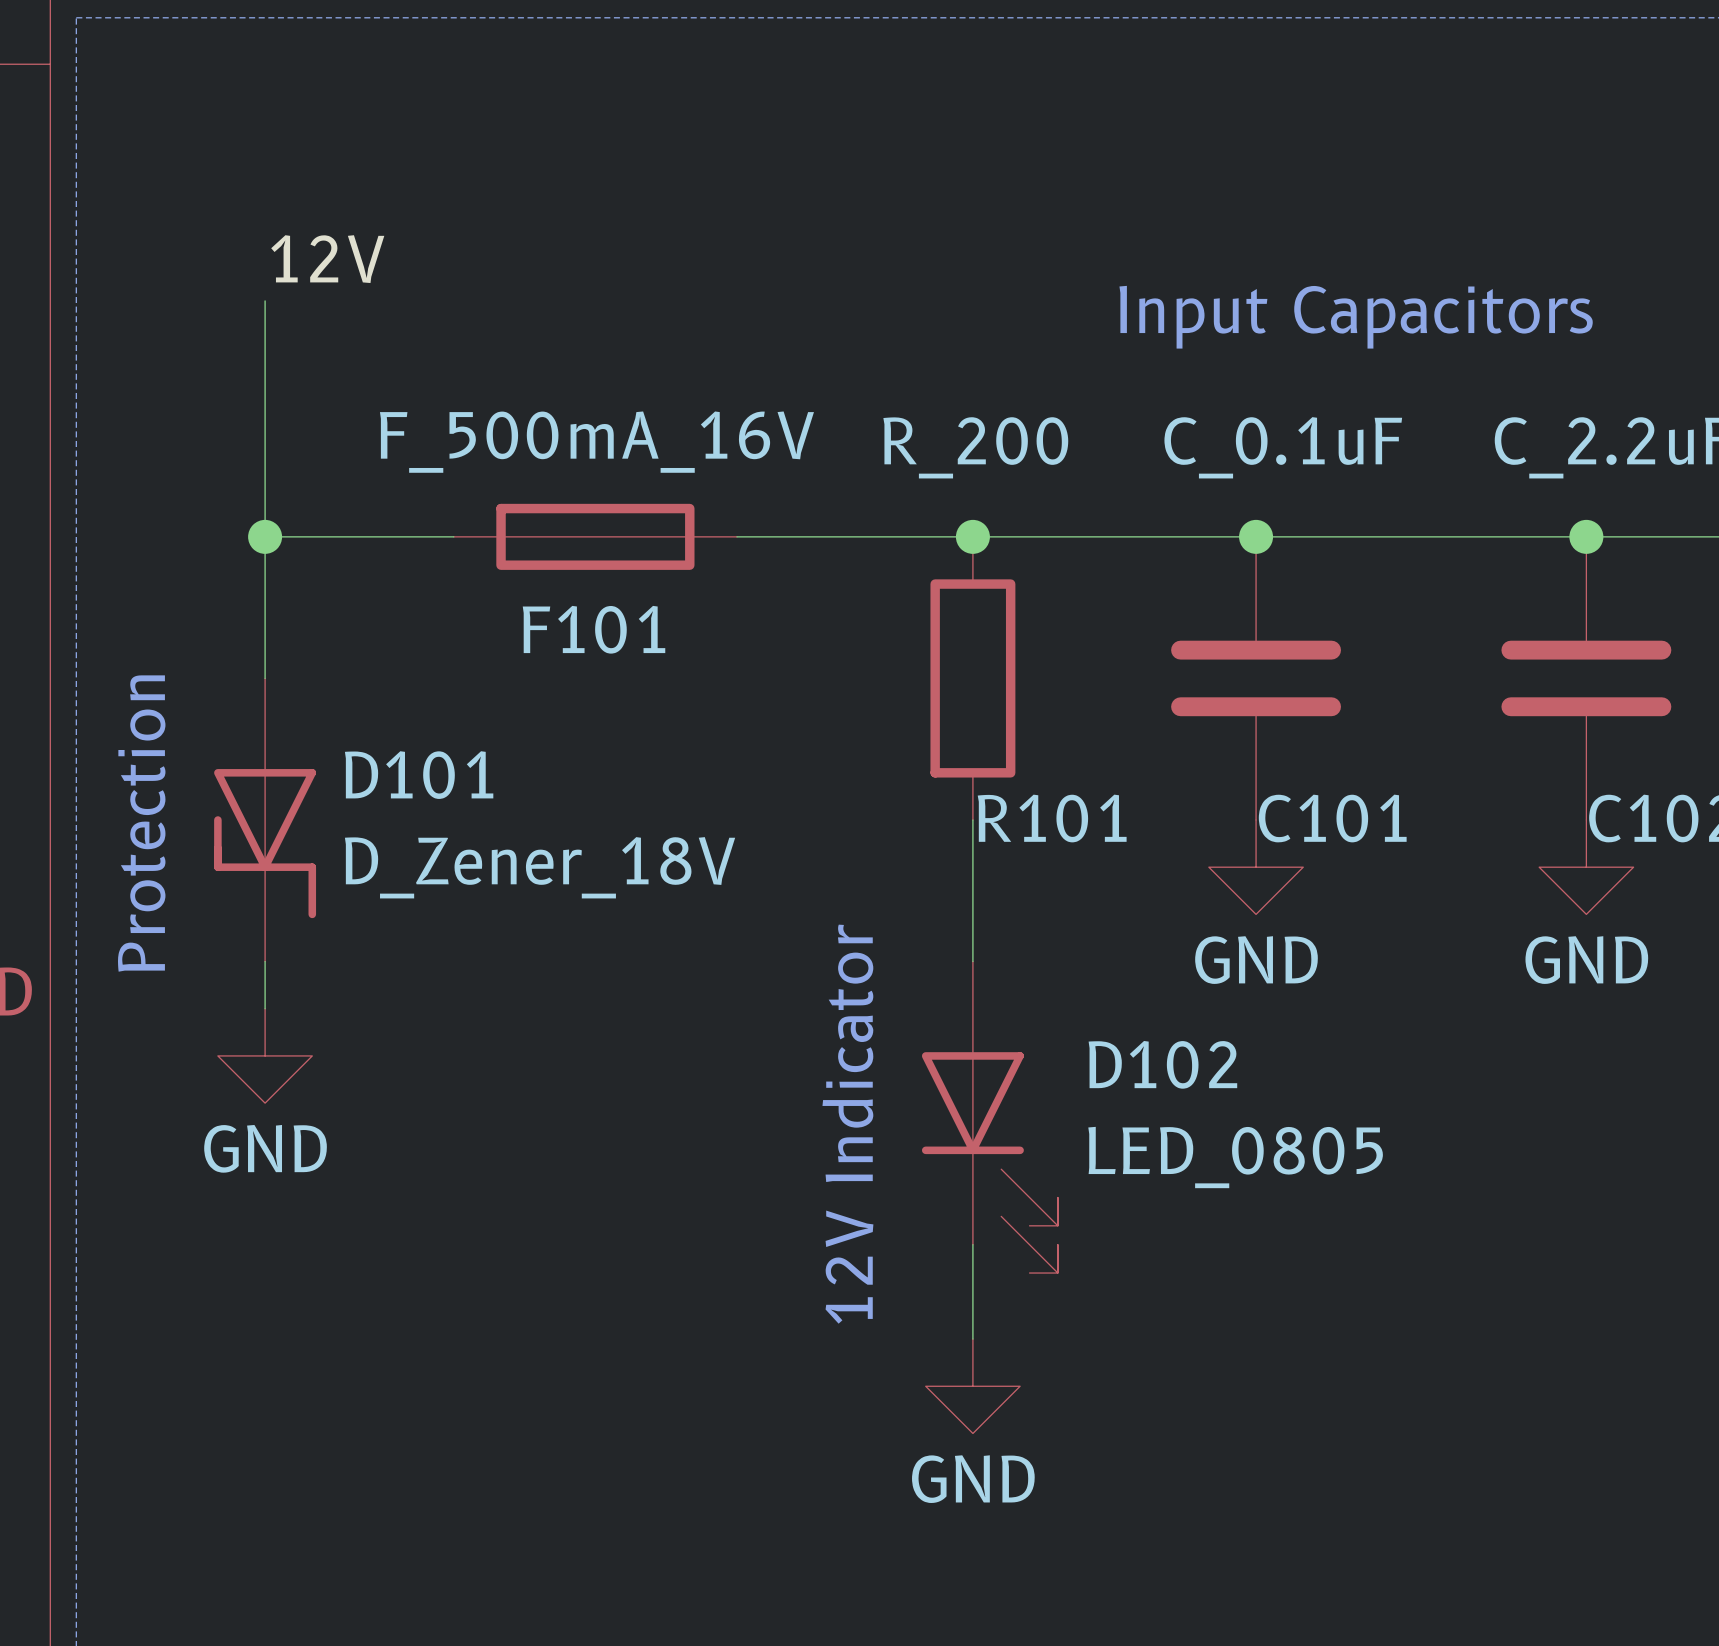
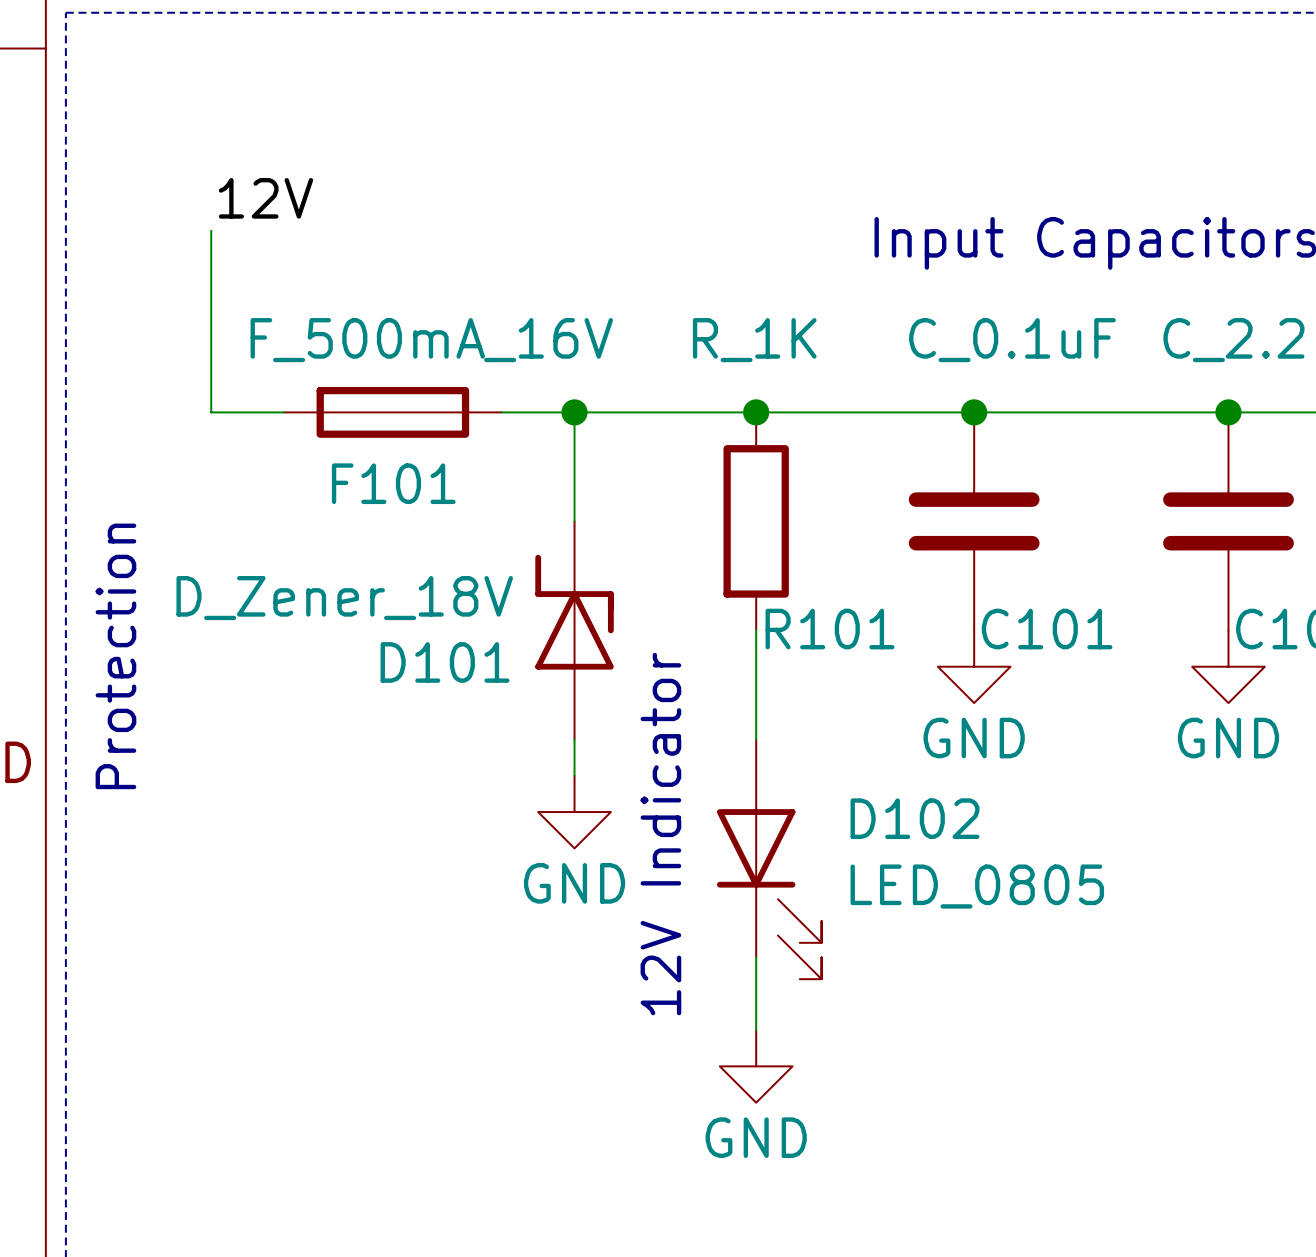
F101 value position: F_500mA_16V (596, 442) -> F_500mA_16V (431, 340)
R101 value: R_200 (975, 447) -> R_1K (754, 340)
wire: (265, 536) (265, 678) -> none
junction: (265, 536) -> none
F101 position: (595, 536) -> (392, 412)
wire: none -> (501, 412) (574, 412) (574, 521)
junction: none -> (574, 412)
D101 position: (265, 820) -> (574, 630)
D101 rotation: 0° (265, 843) -> 180° (574, 612)
wire: (265, 961) (265, 1008) -> (574, 739) (574, 775)
power symbol position: GND (265, 1055) -> GND (574, 812)

